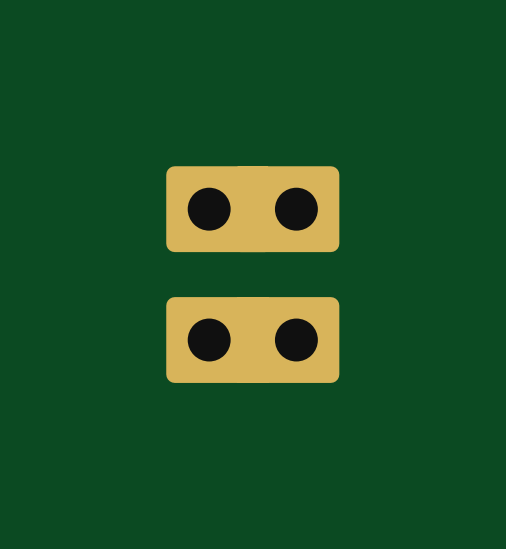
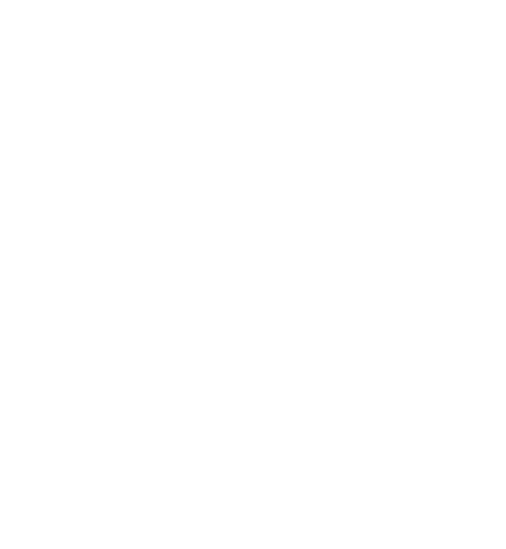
part: (252, 274) -> none

